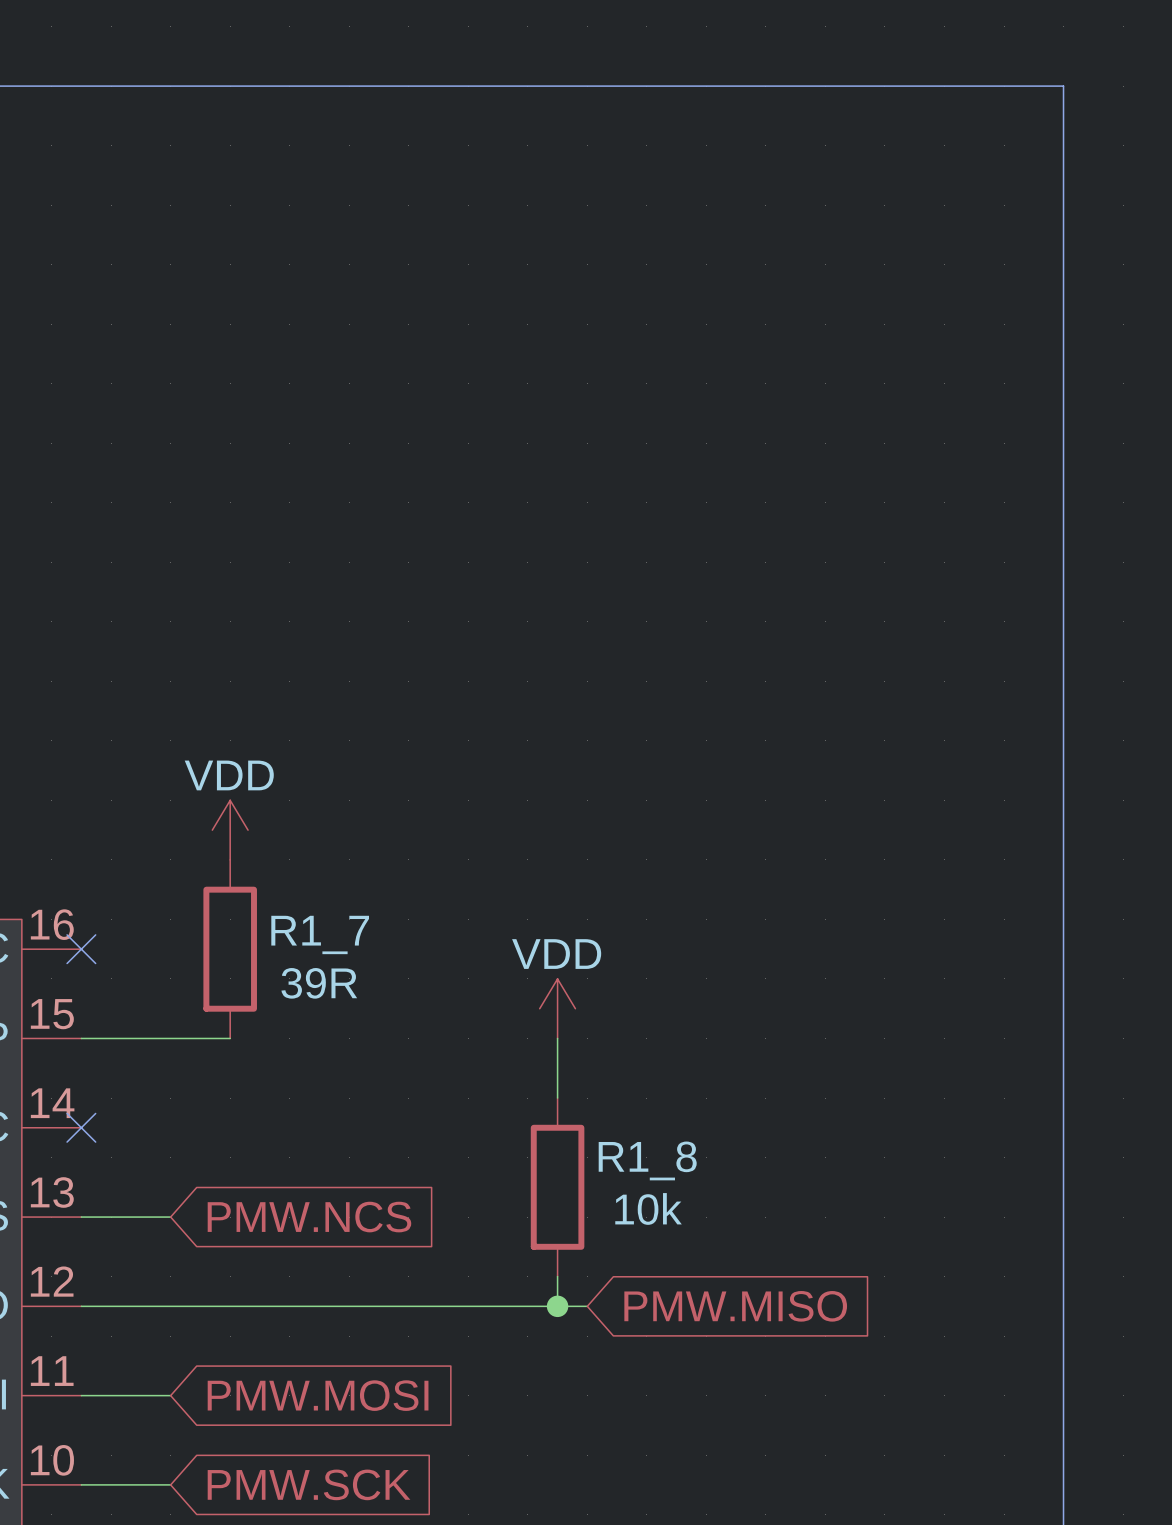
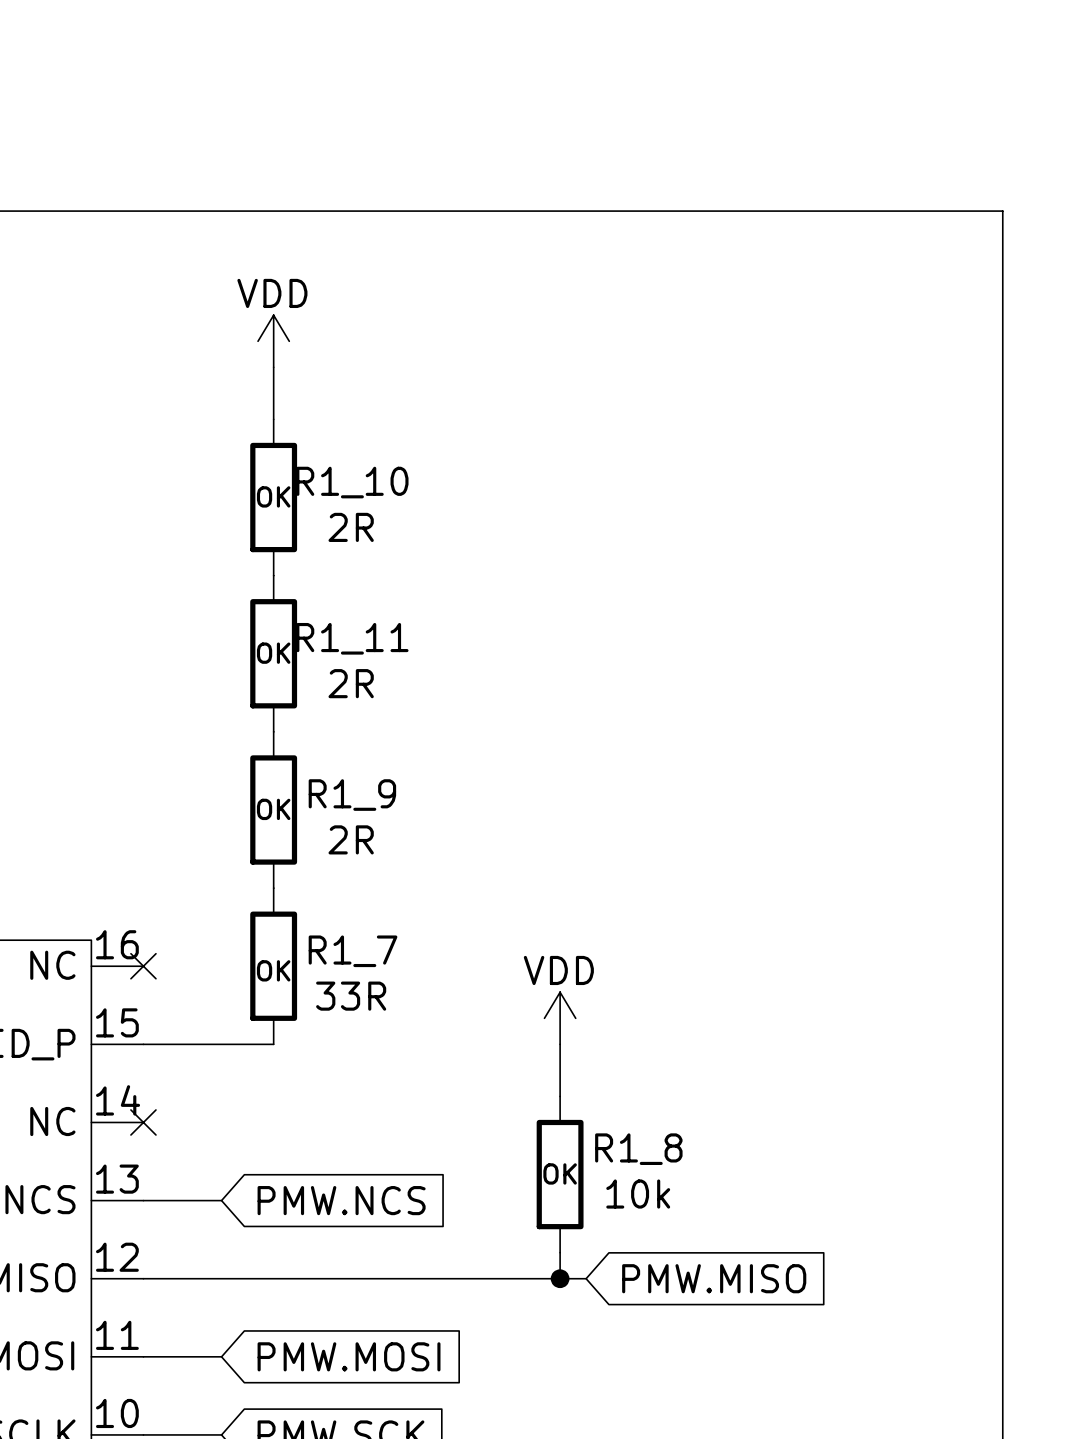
power symbol: none -> VDD (273, 341)
wire: none -> (273, 367) (273, 419)
text: none -> OK (273, 496)
R1_10: none -> 2R (273, 497)
text: none -> OK (273, 653)
R1_11: none -> 2R (273, 653)
text: none -> OK (273, 809)
R1_9: none -> 2R (273, 810)
power symbol: VDD (230, 830) -> none
text: none -> OK (273, 970)
R1_7 value: 39R (319, 983) -> 33R (351, 996)
text: none -> OK (560, 1173)

